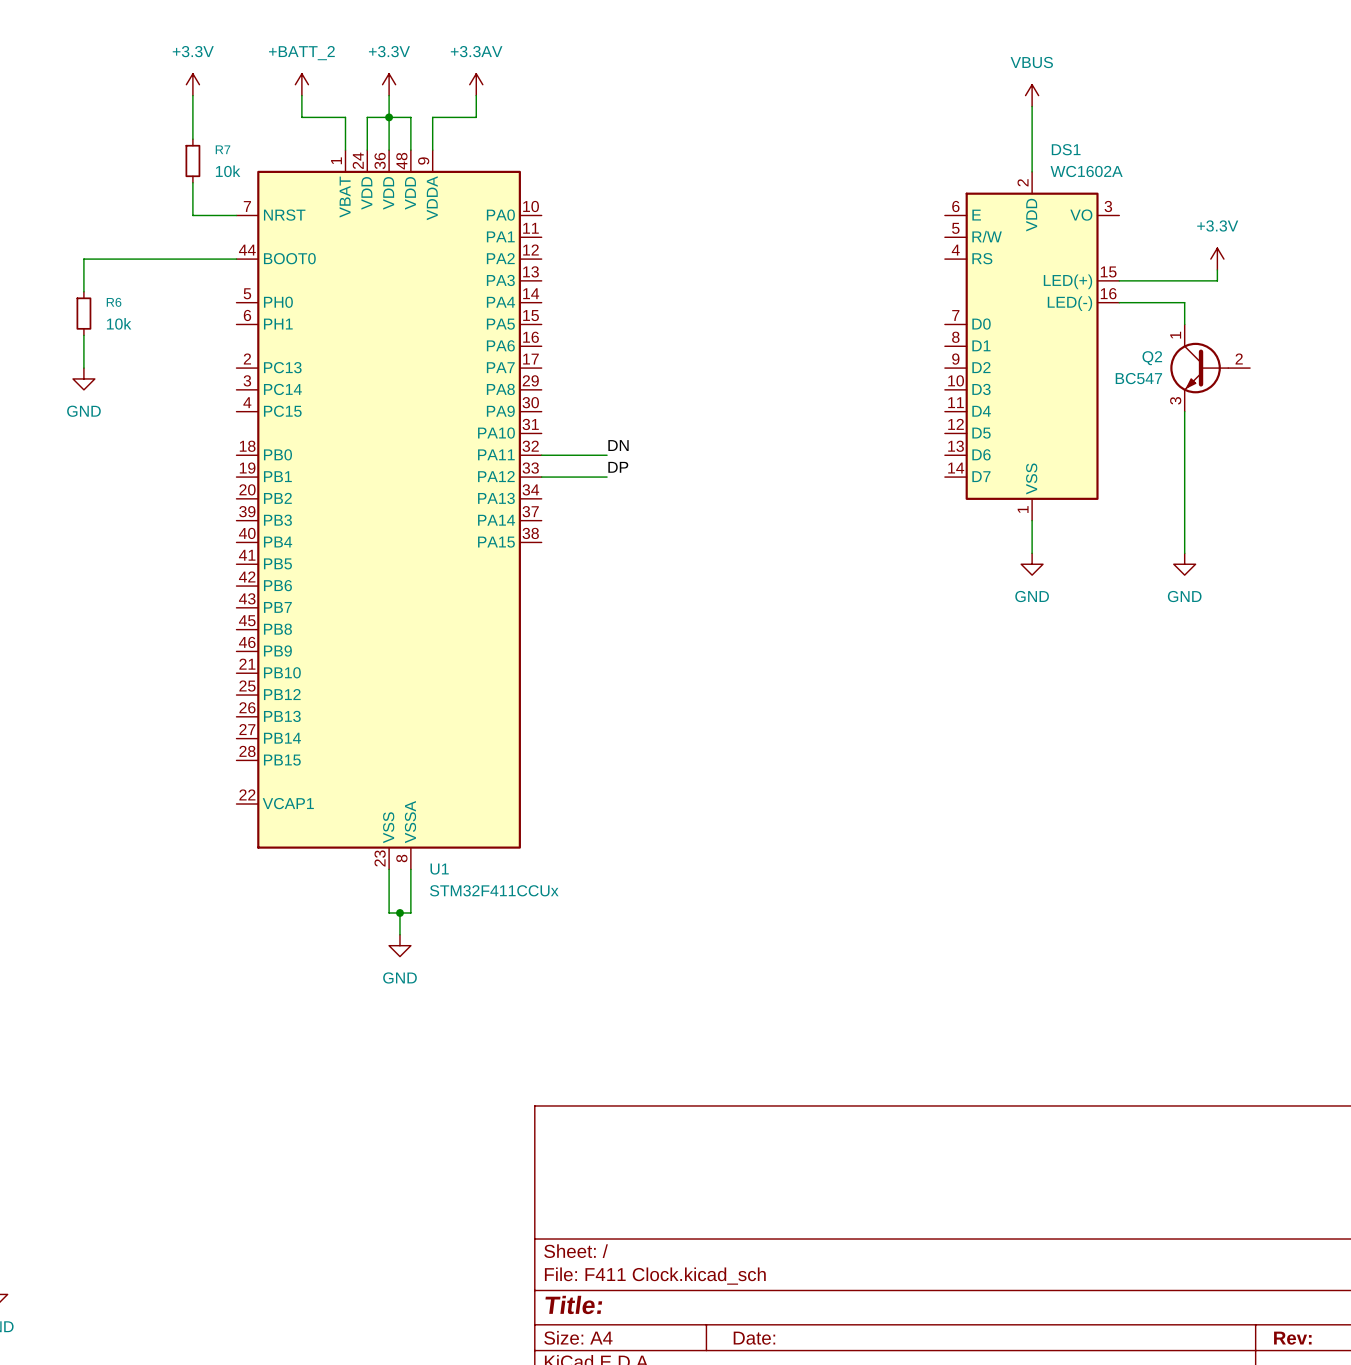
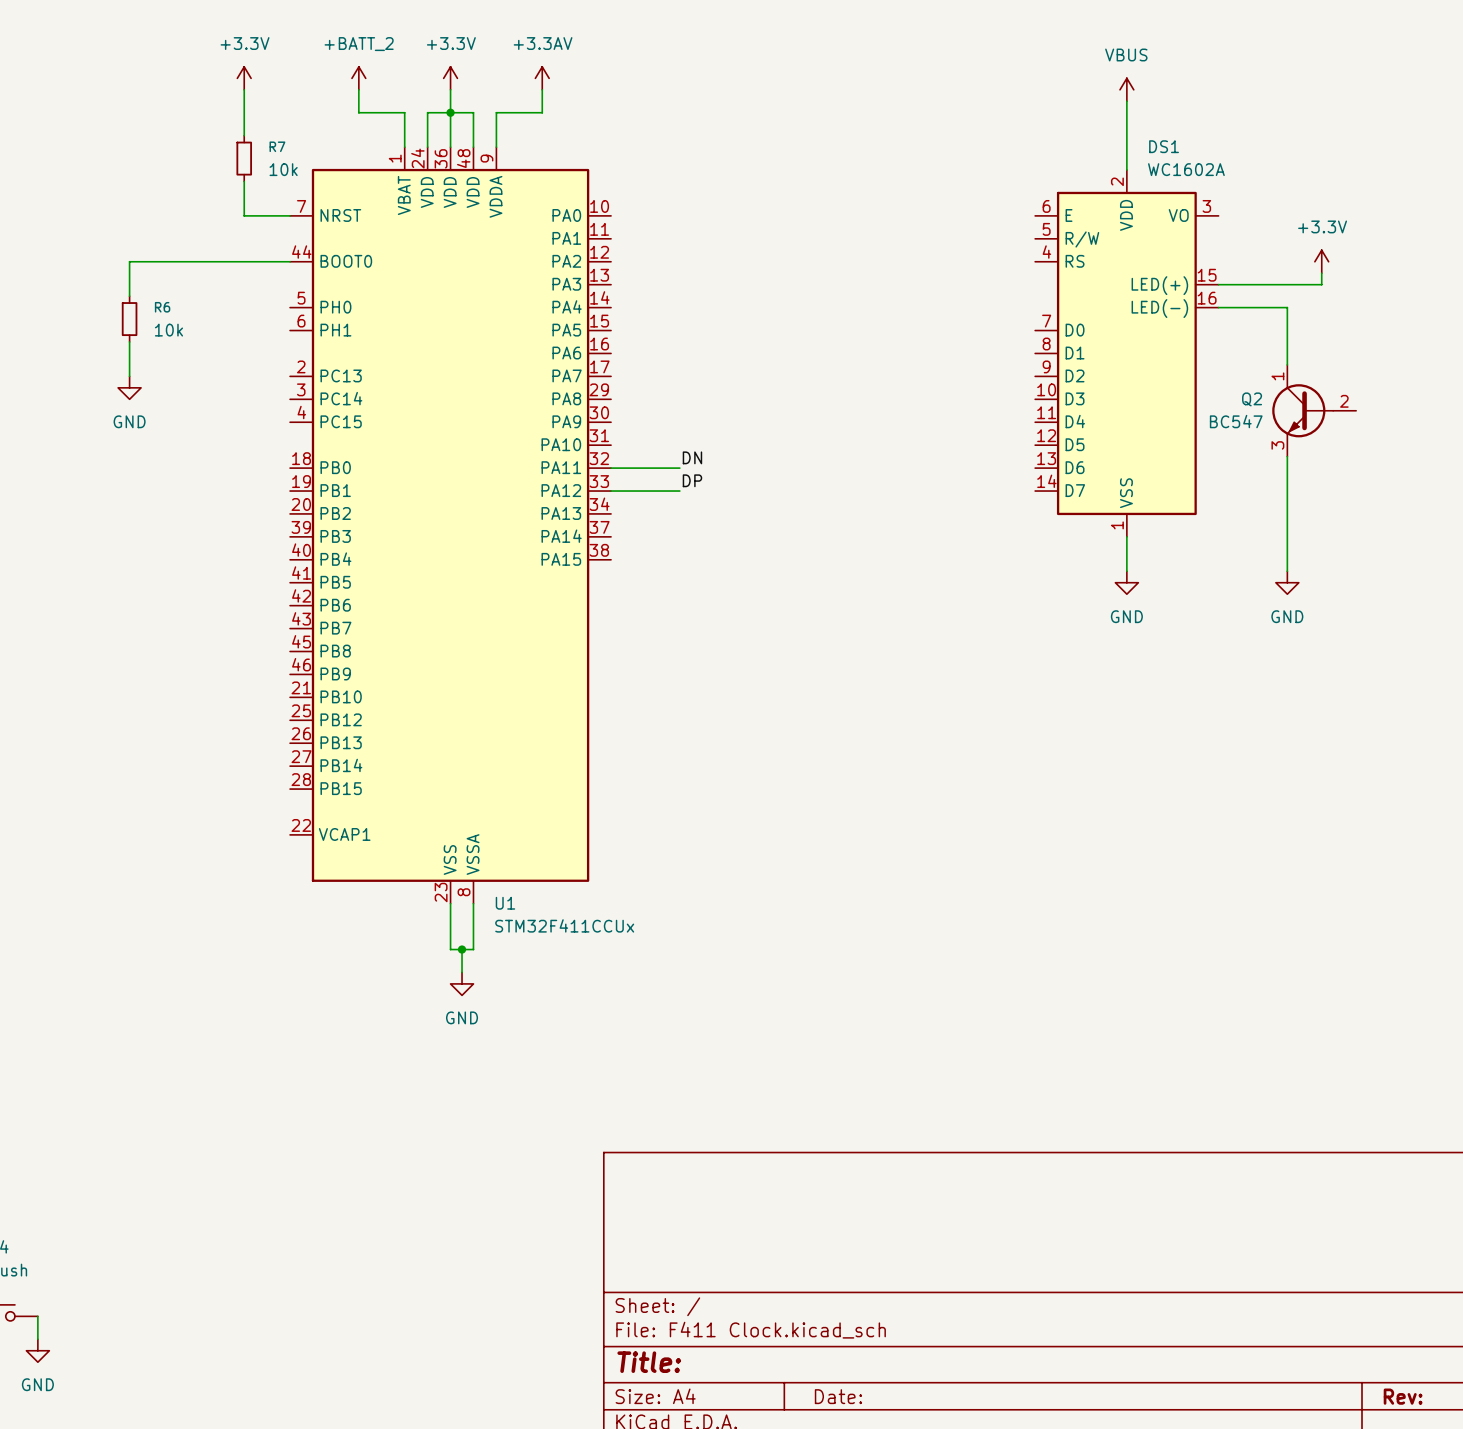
Q2 position: (1210, 368) -> (1314, 410)

